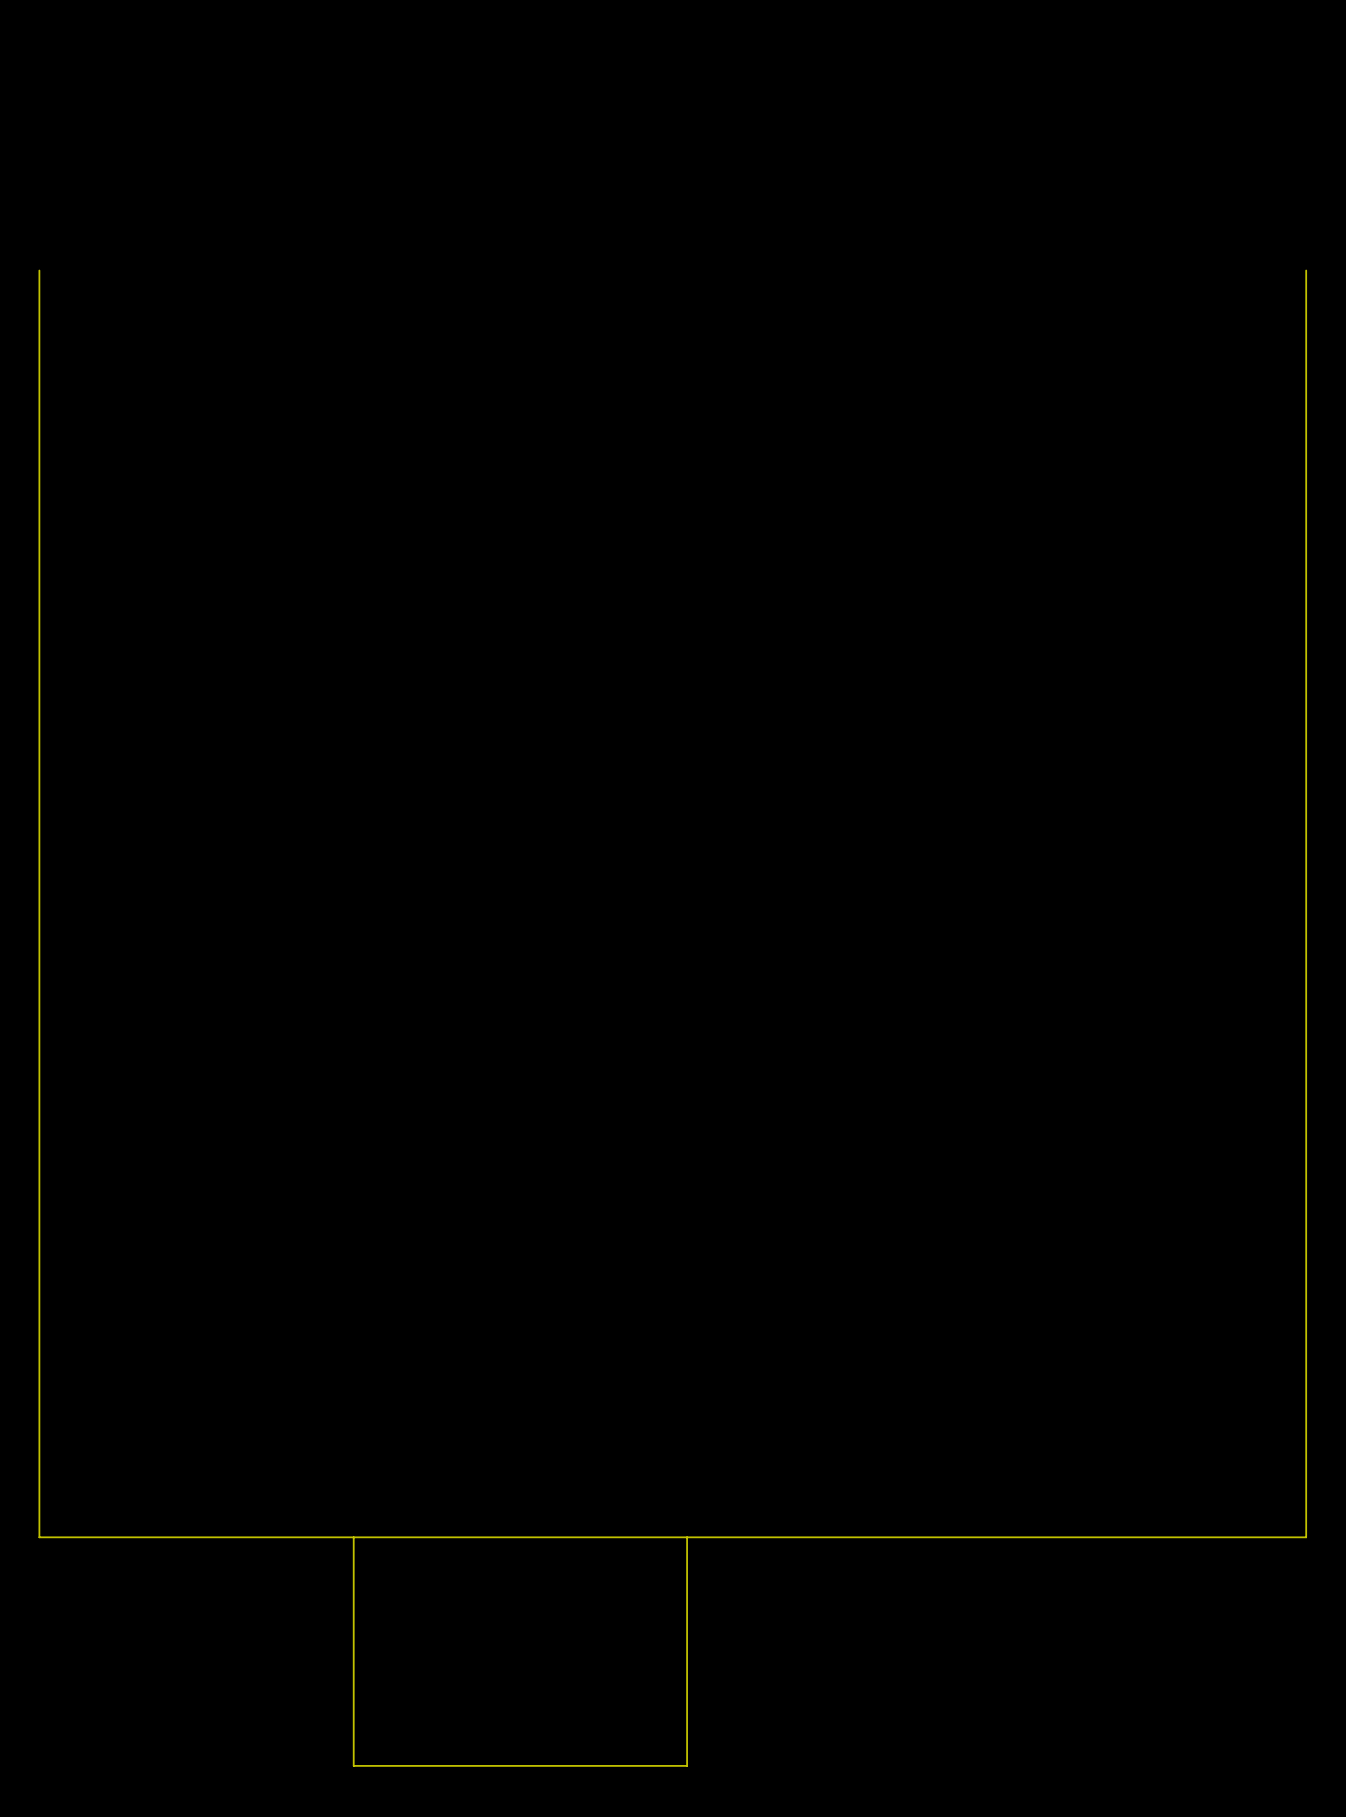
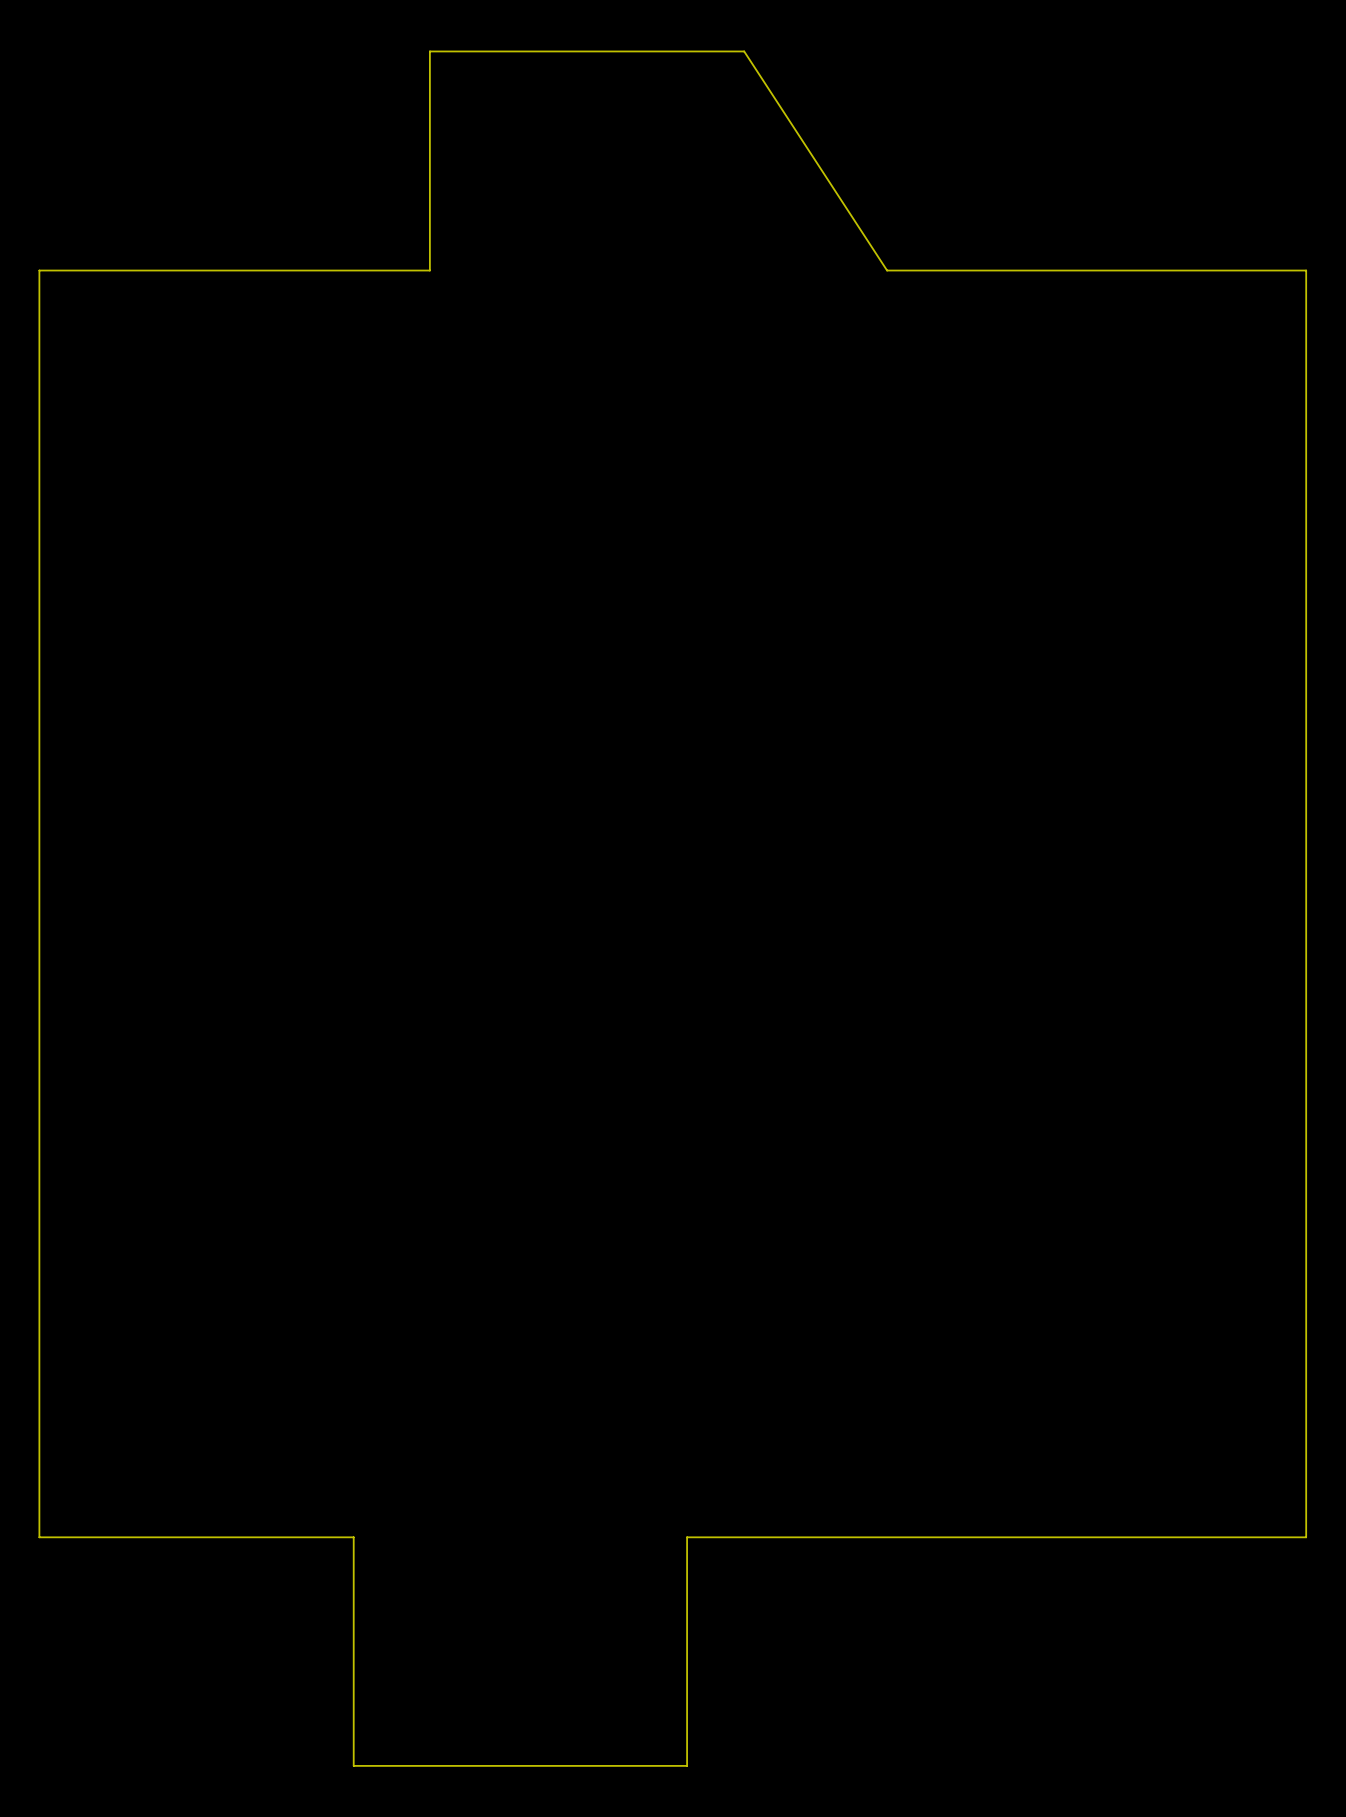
board edge: none -> (1306, 270) (887, 270) (744, 51) (429, 51) (429, 270) (39, 270)
board edge: (687, 1537) (353, 1537) -> none

